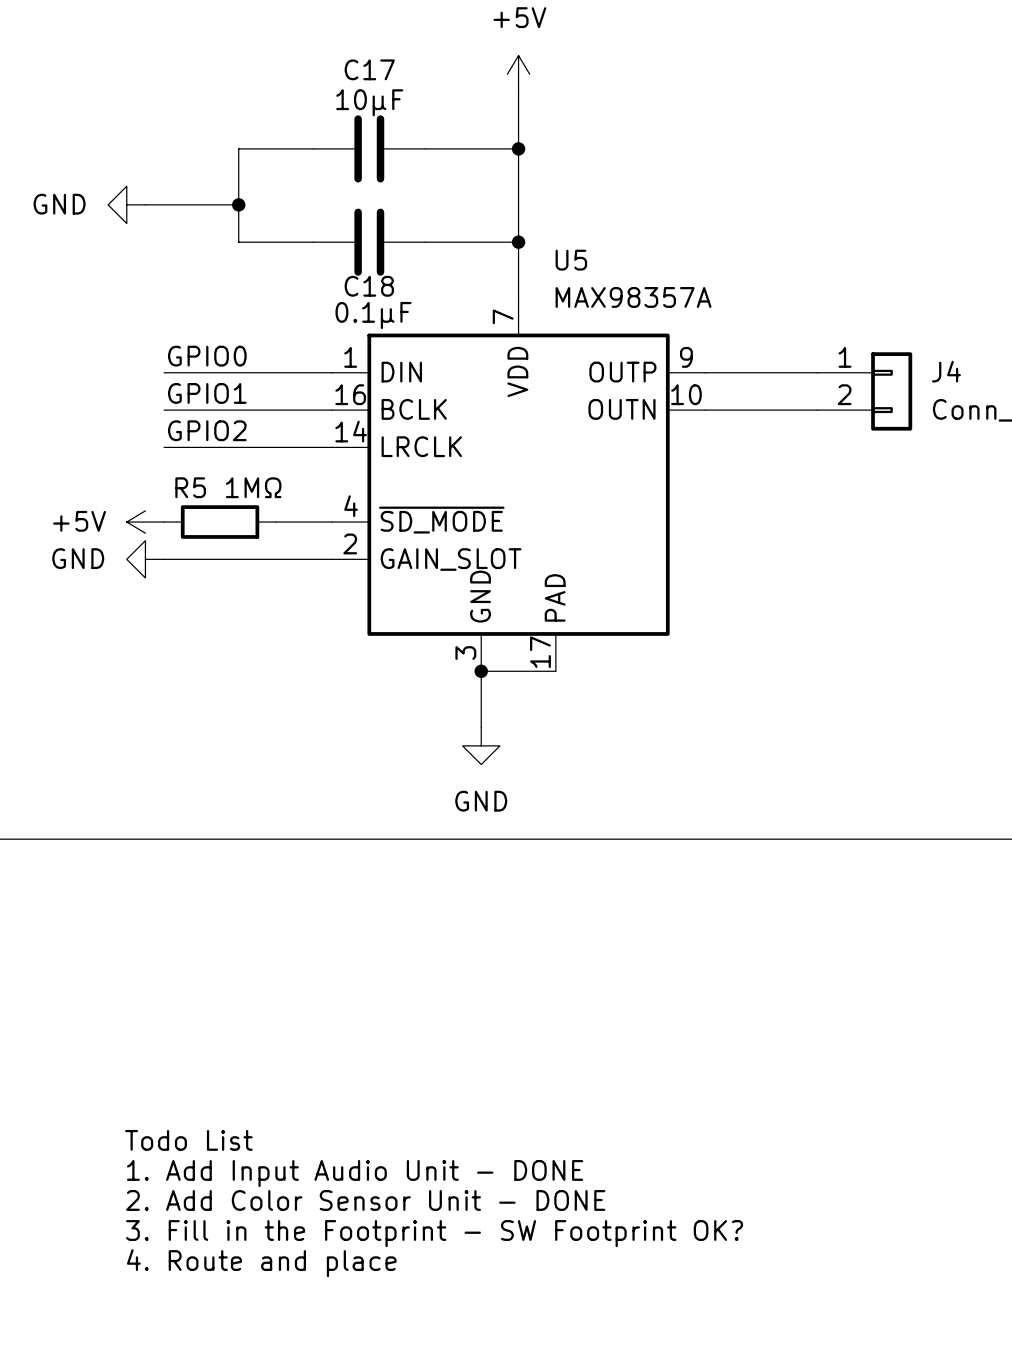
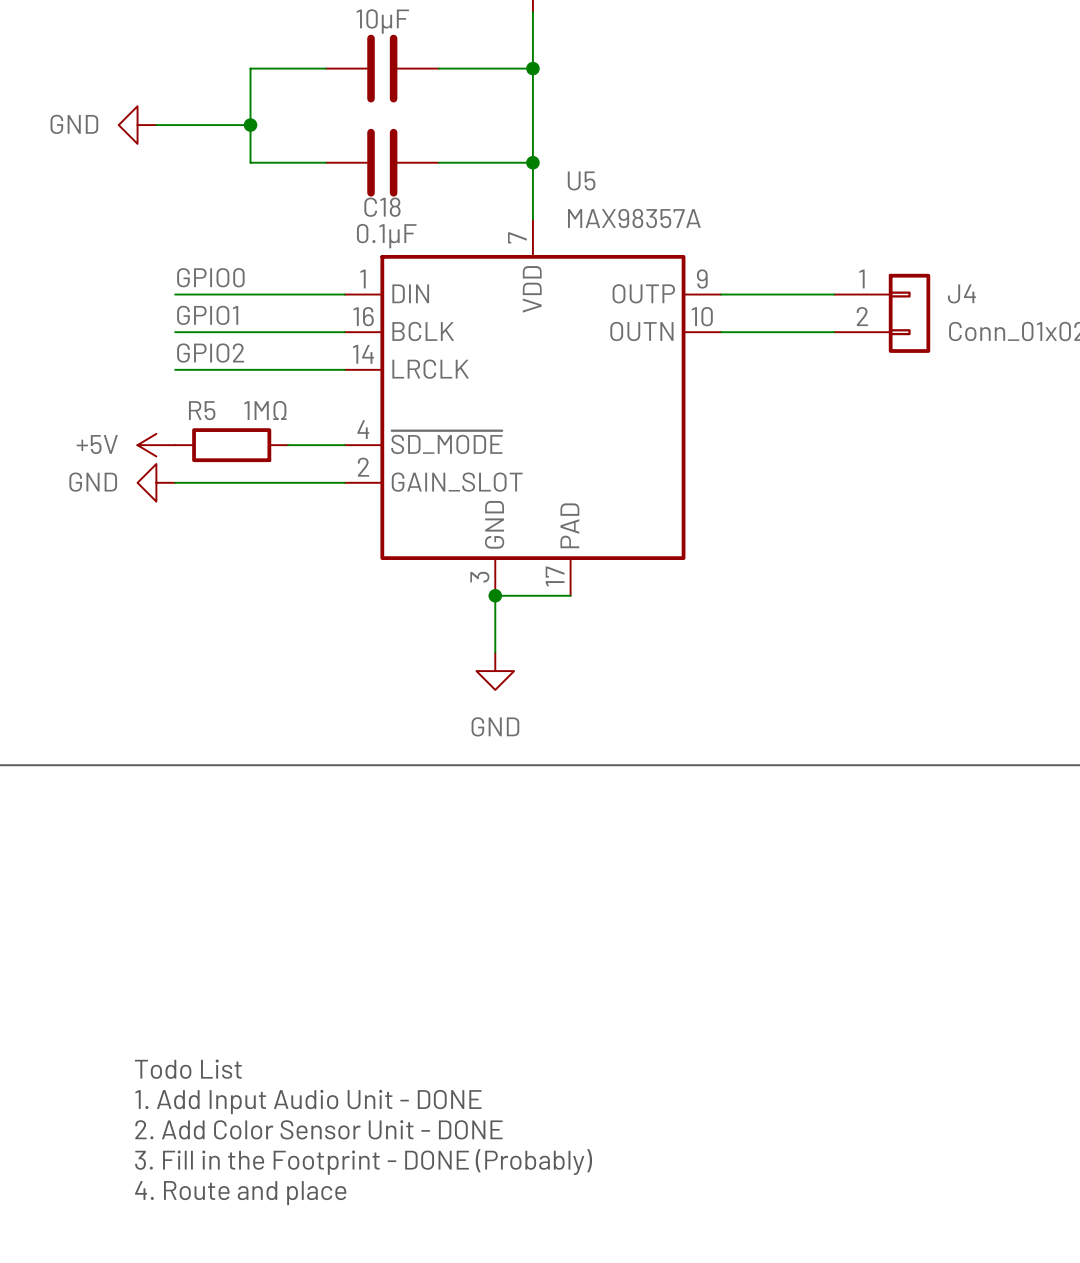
text: 3. Fill in the Footprint - SW Footprint OK? (434, 1233) -> 3. Fill in the Footprint - DONE (Probably) (363, 1162)

